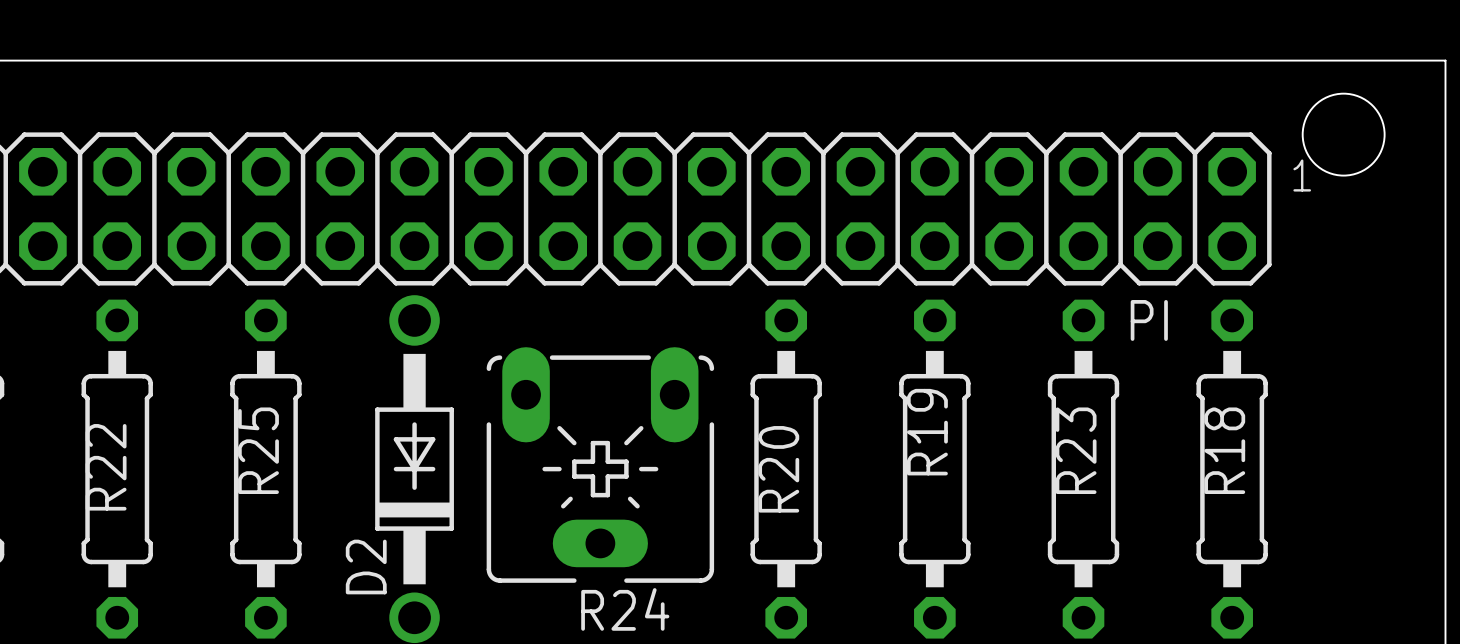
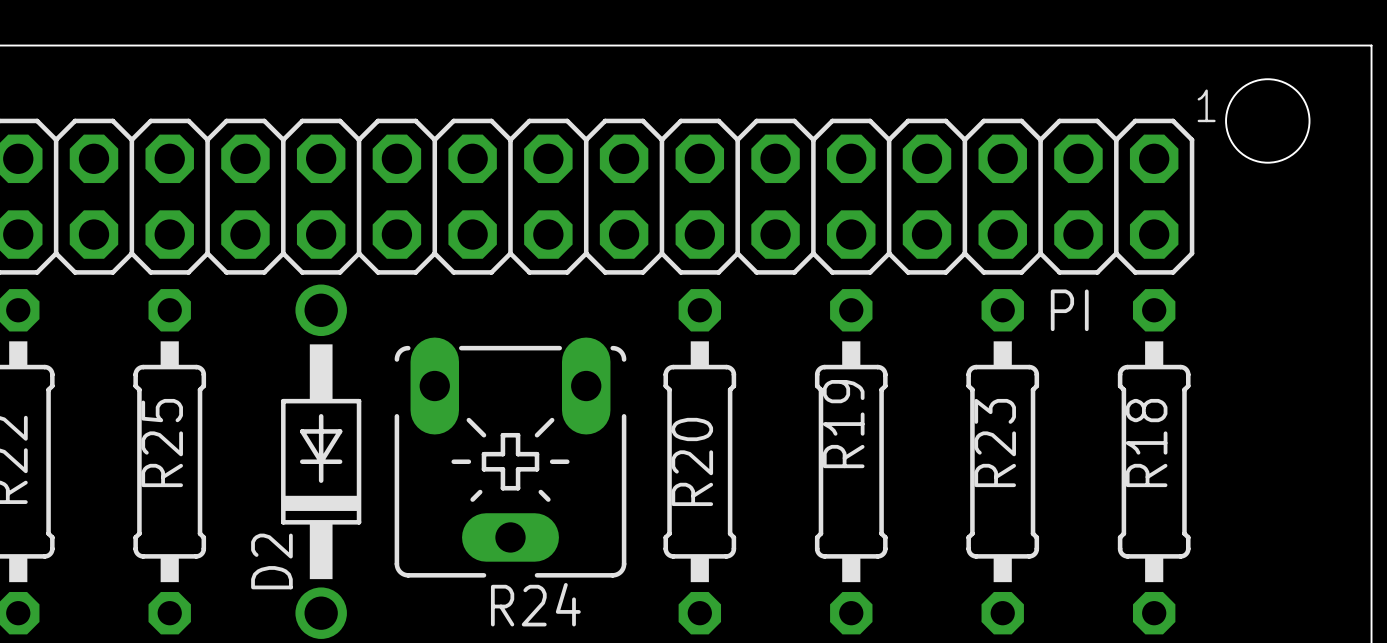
text position: 1 (1302, 175) -> 1 (1206, 105)

